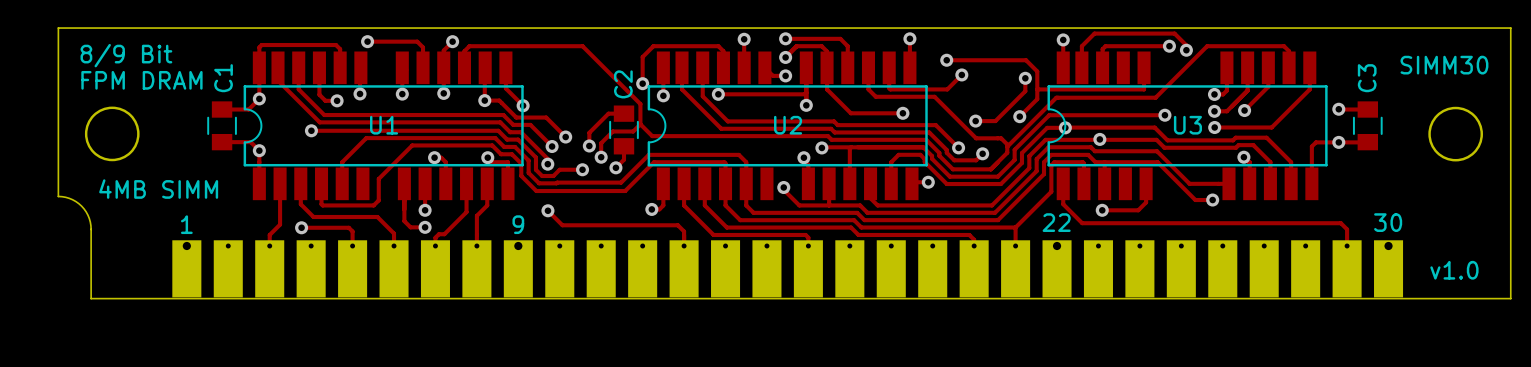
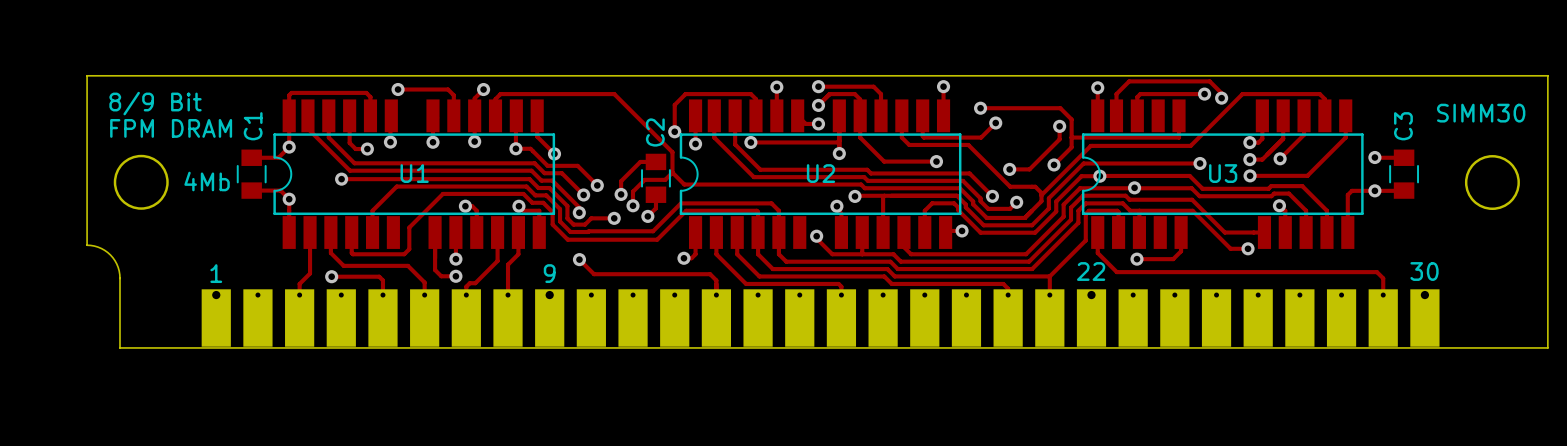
text: none -> 4Mb (207, 181)
text: 4MB SIMM (158, 189) -> none
text: v1.0 (1454, 270) -> none

